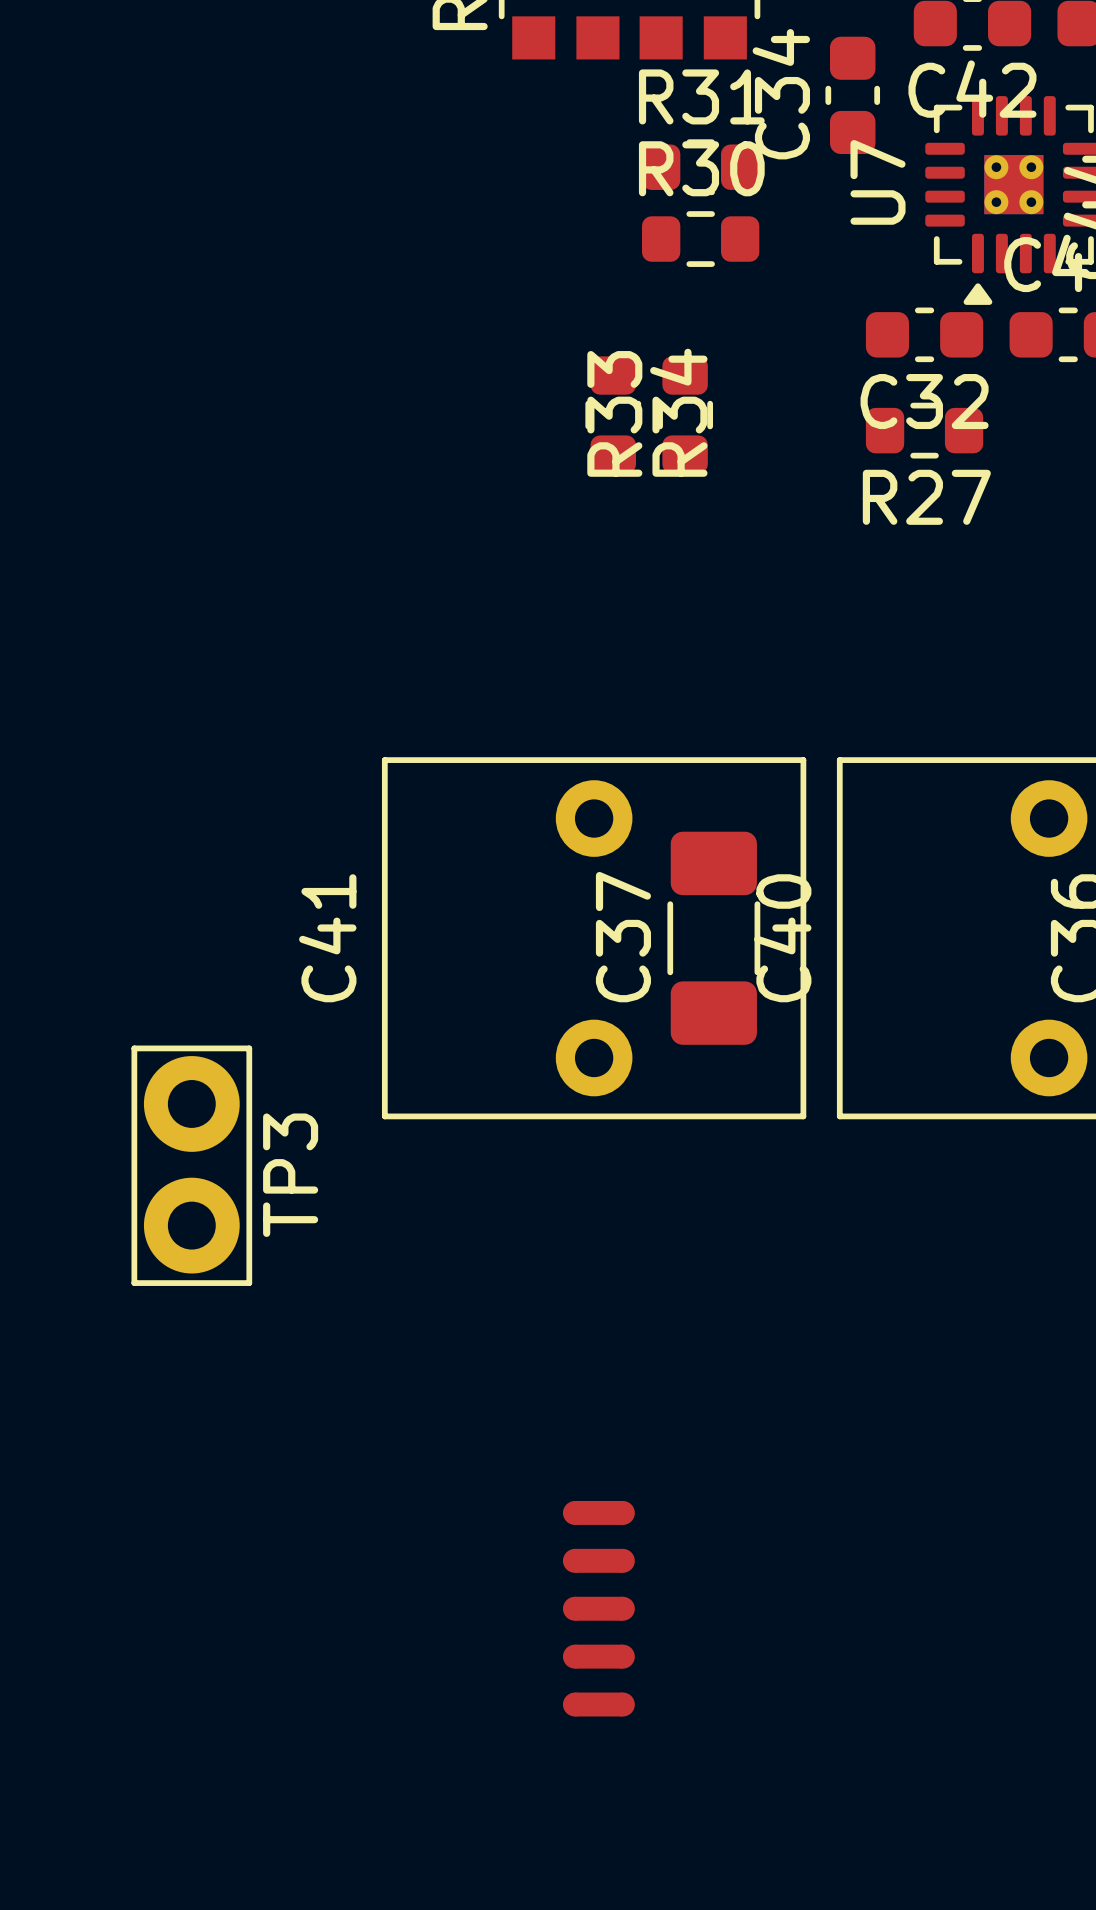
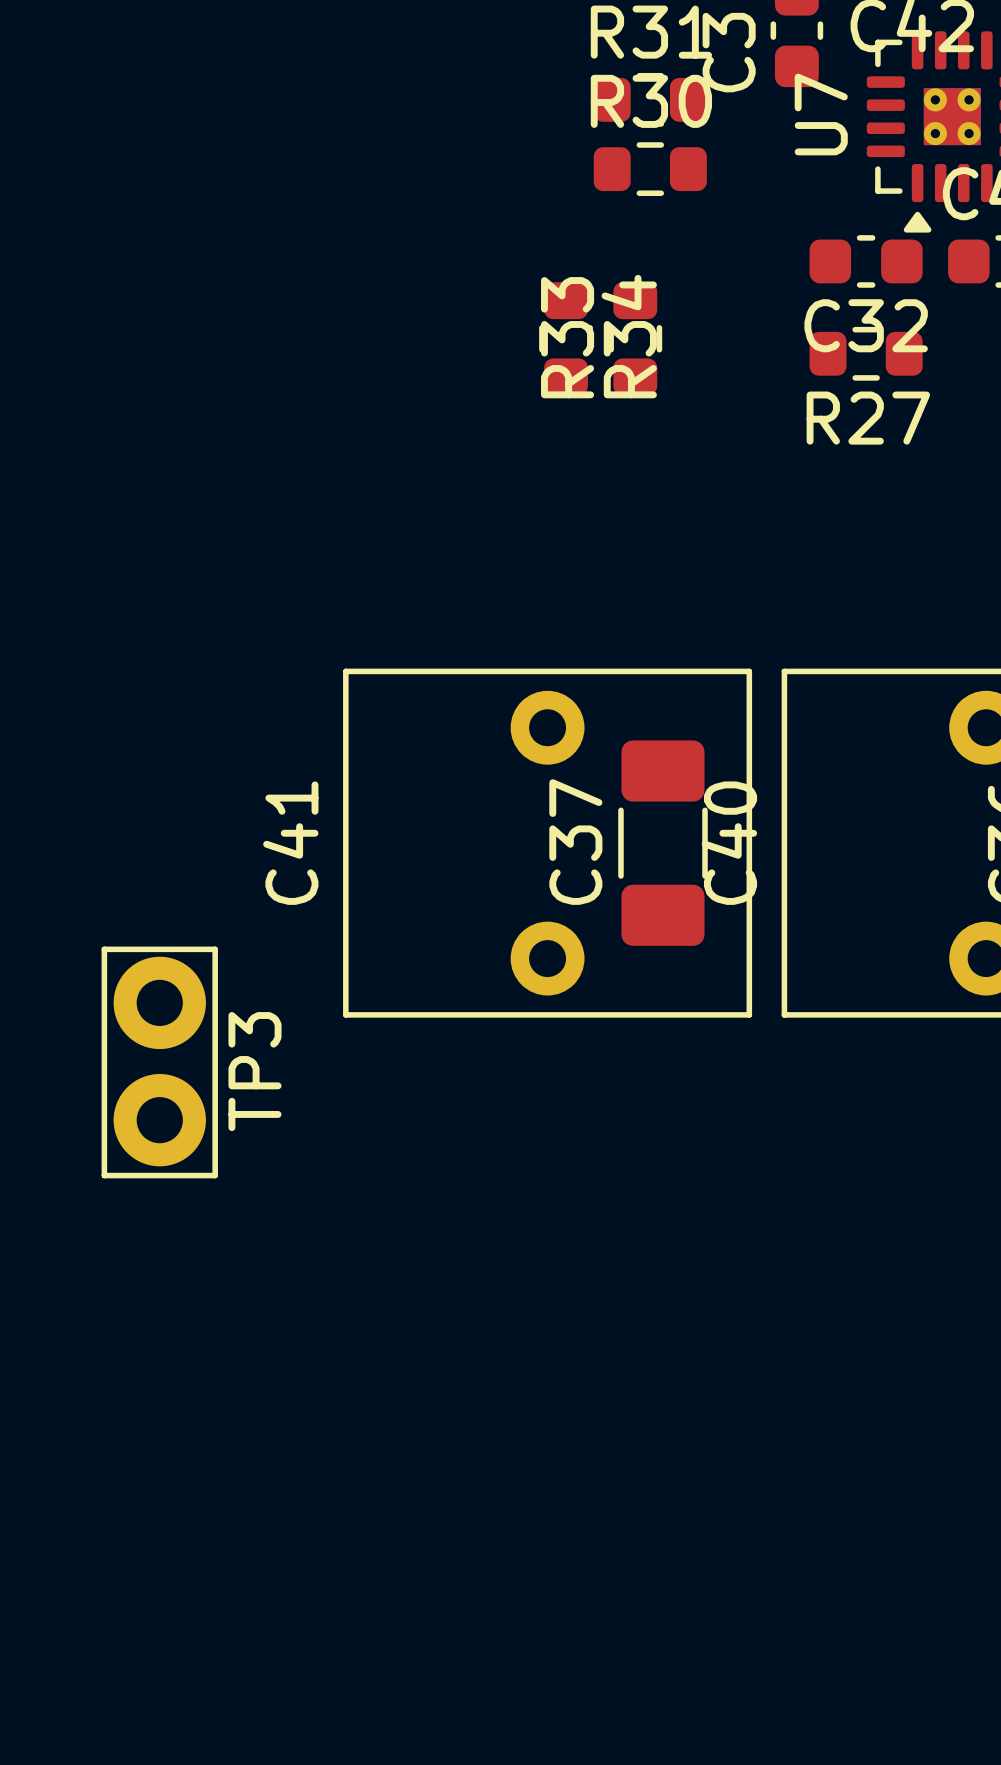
part: (598, 1512) -> none
part: (598, 1560) -> none
part: (598, 1608) -> none
part: (598, 1656) -> none
part: (598, 1704) -> none

